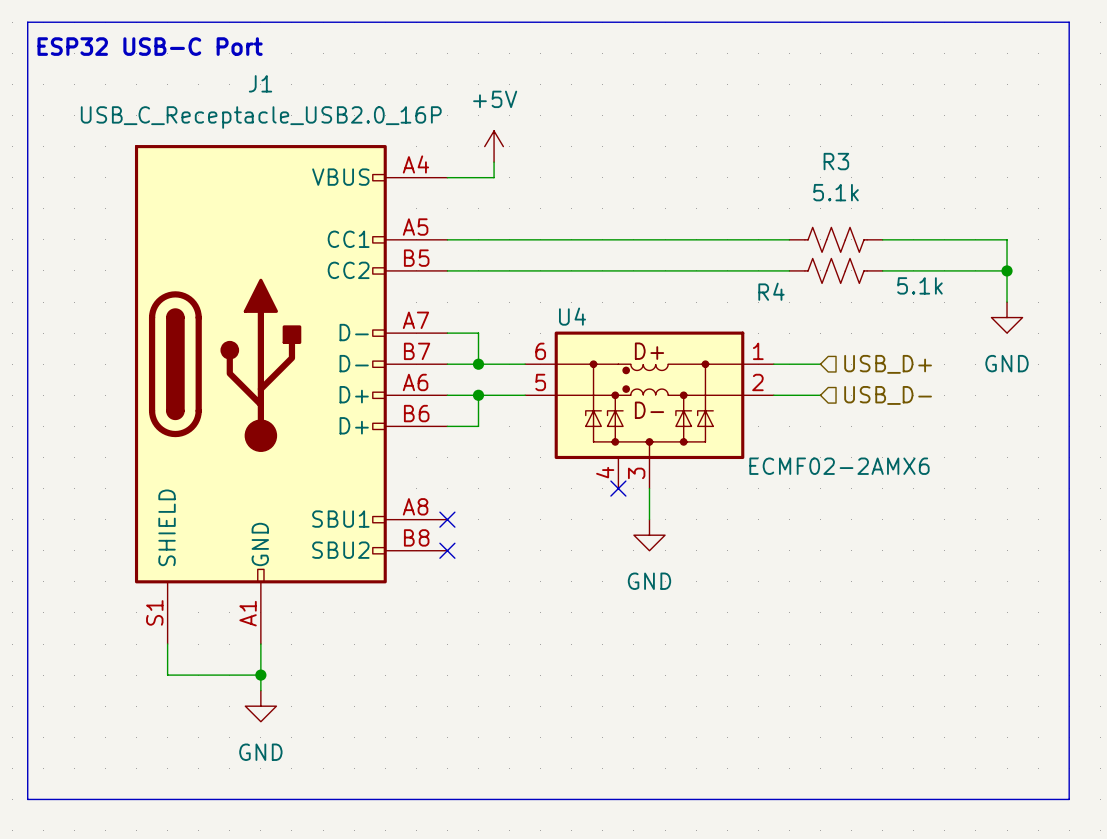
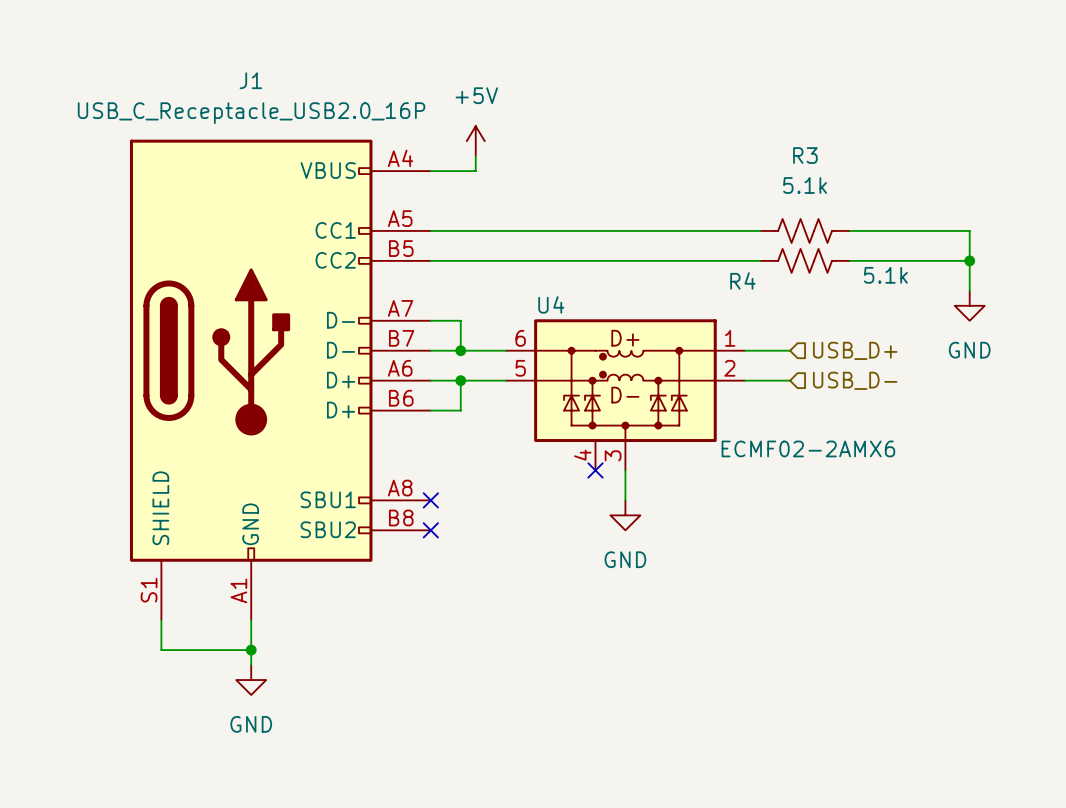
line: (27, 22) (1069, 22) (1069, 799) (27, 799) (27, 22) -> none
text: ESP32 USB-C Port (150, 46) -> none

